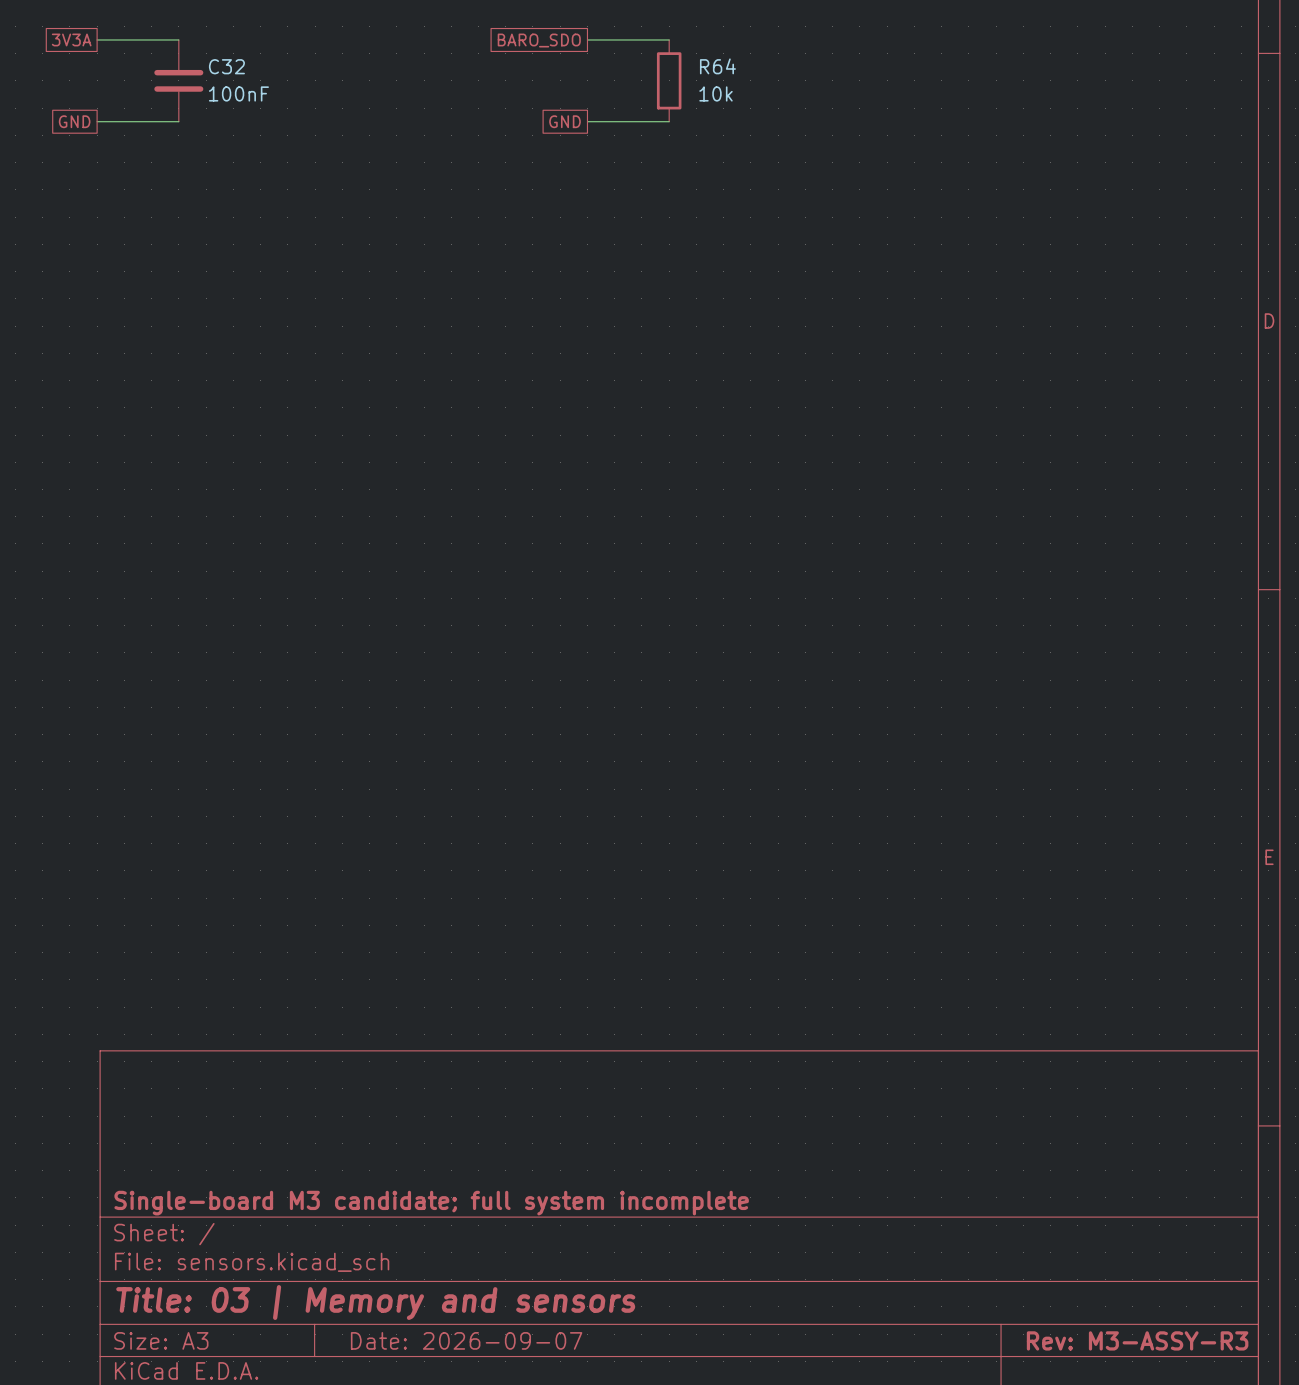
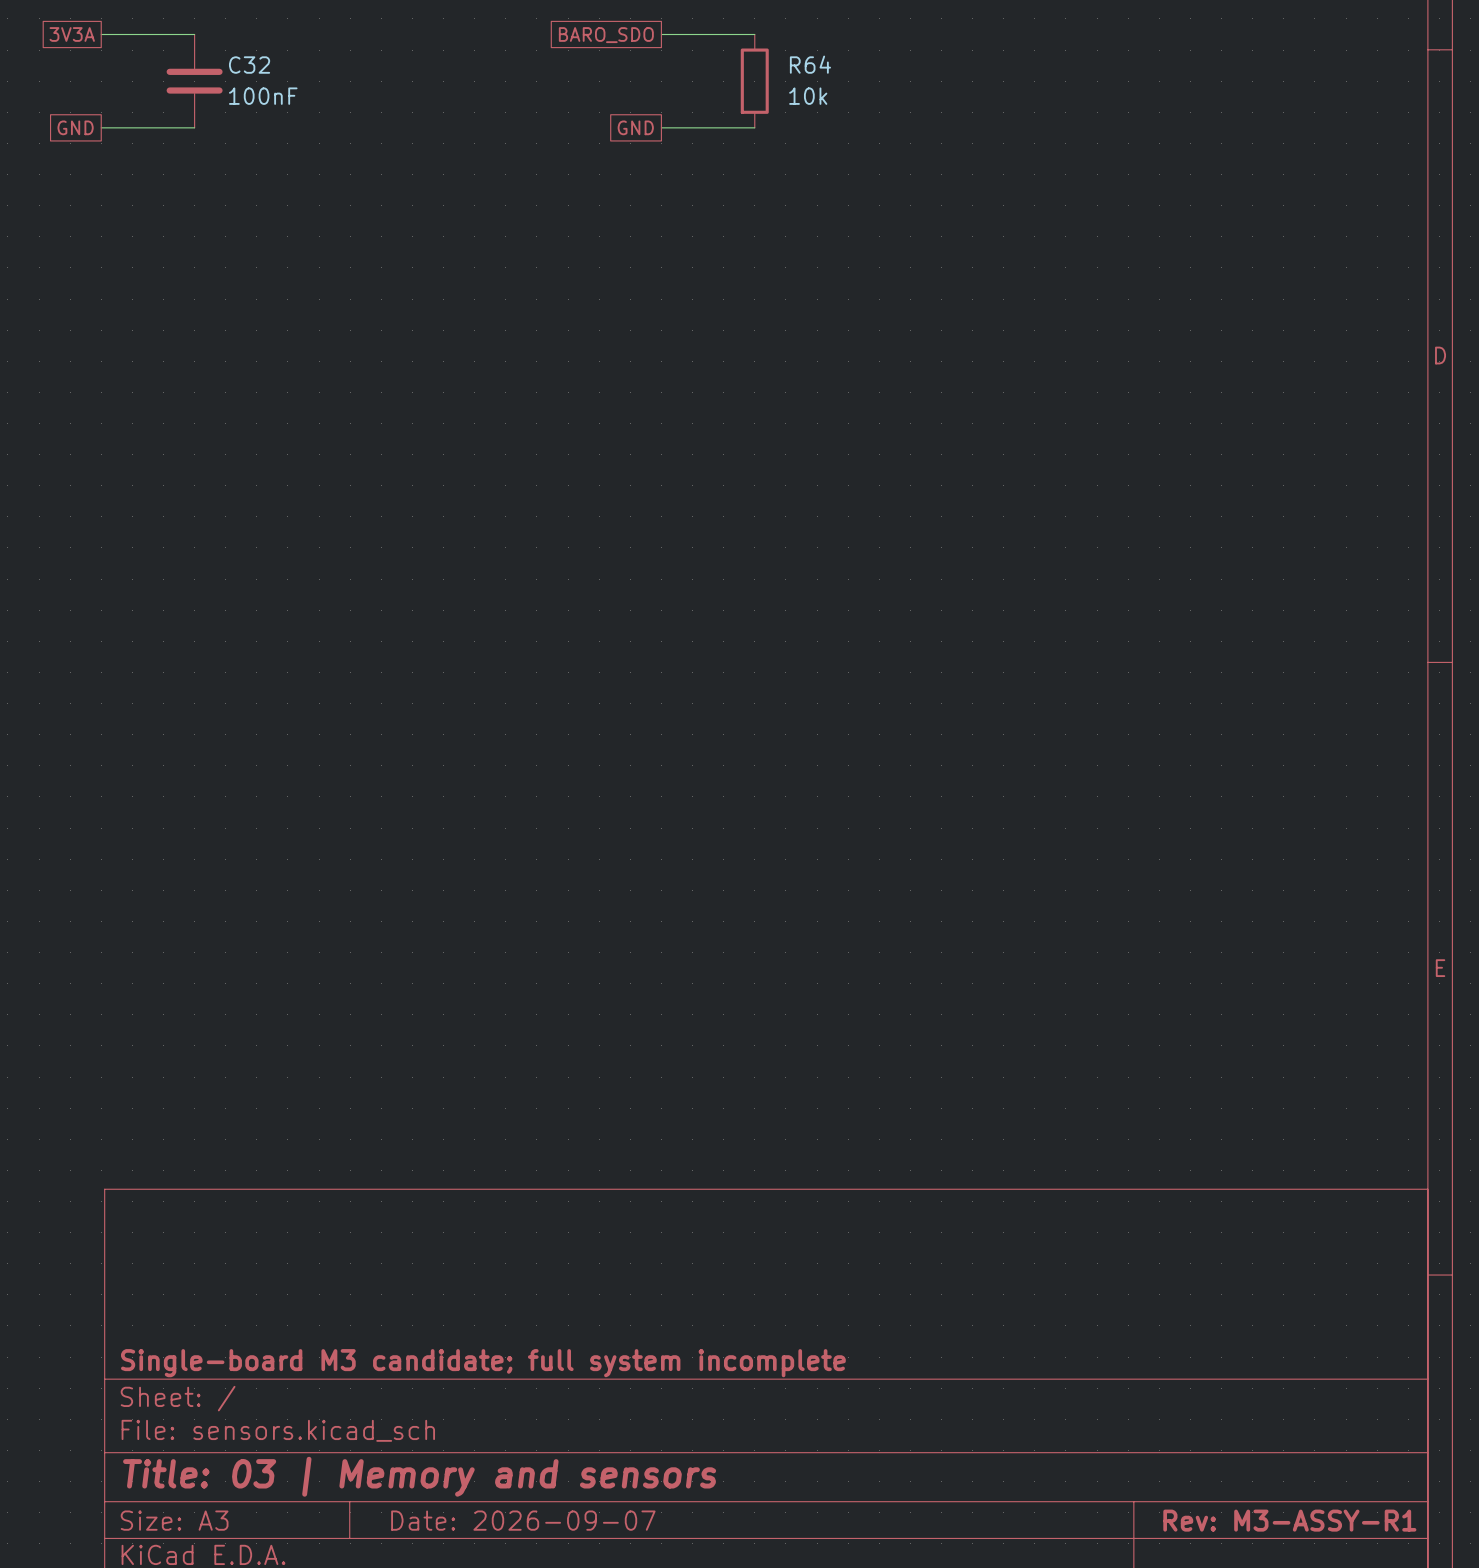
title block: Rev: M3-ASSY-R3 (1137, 1340) -> Rev: M3-ASSY-R1 (1289, 1520)

